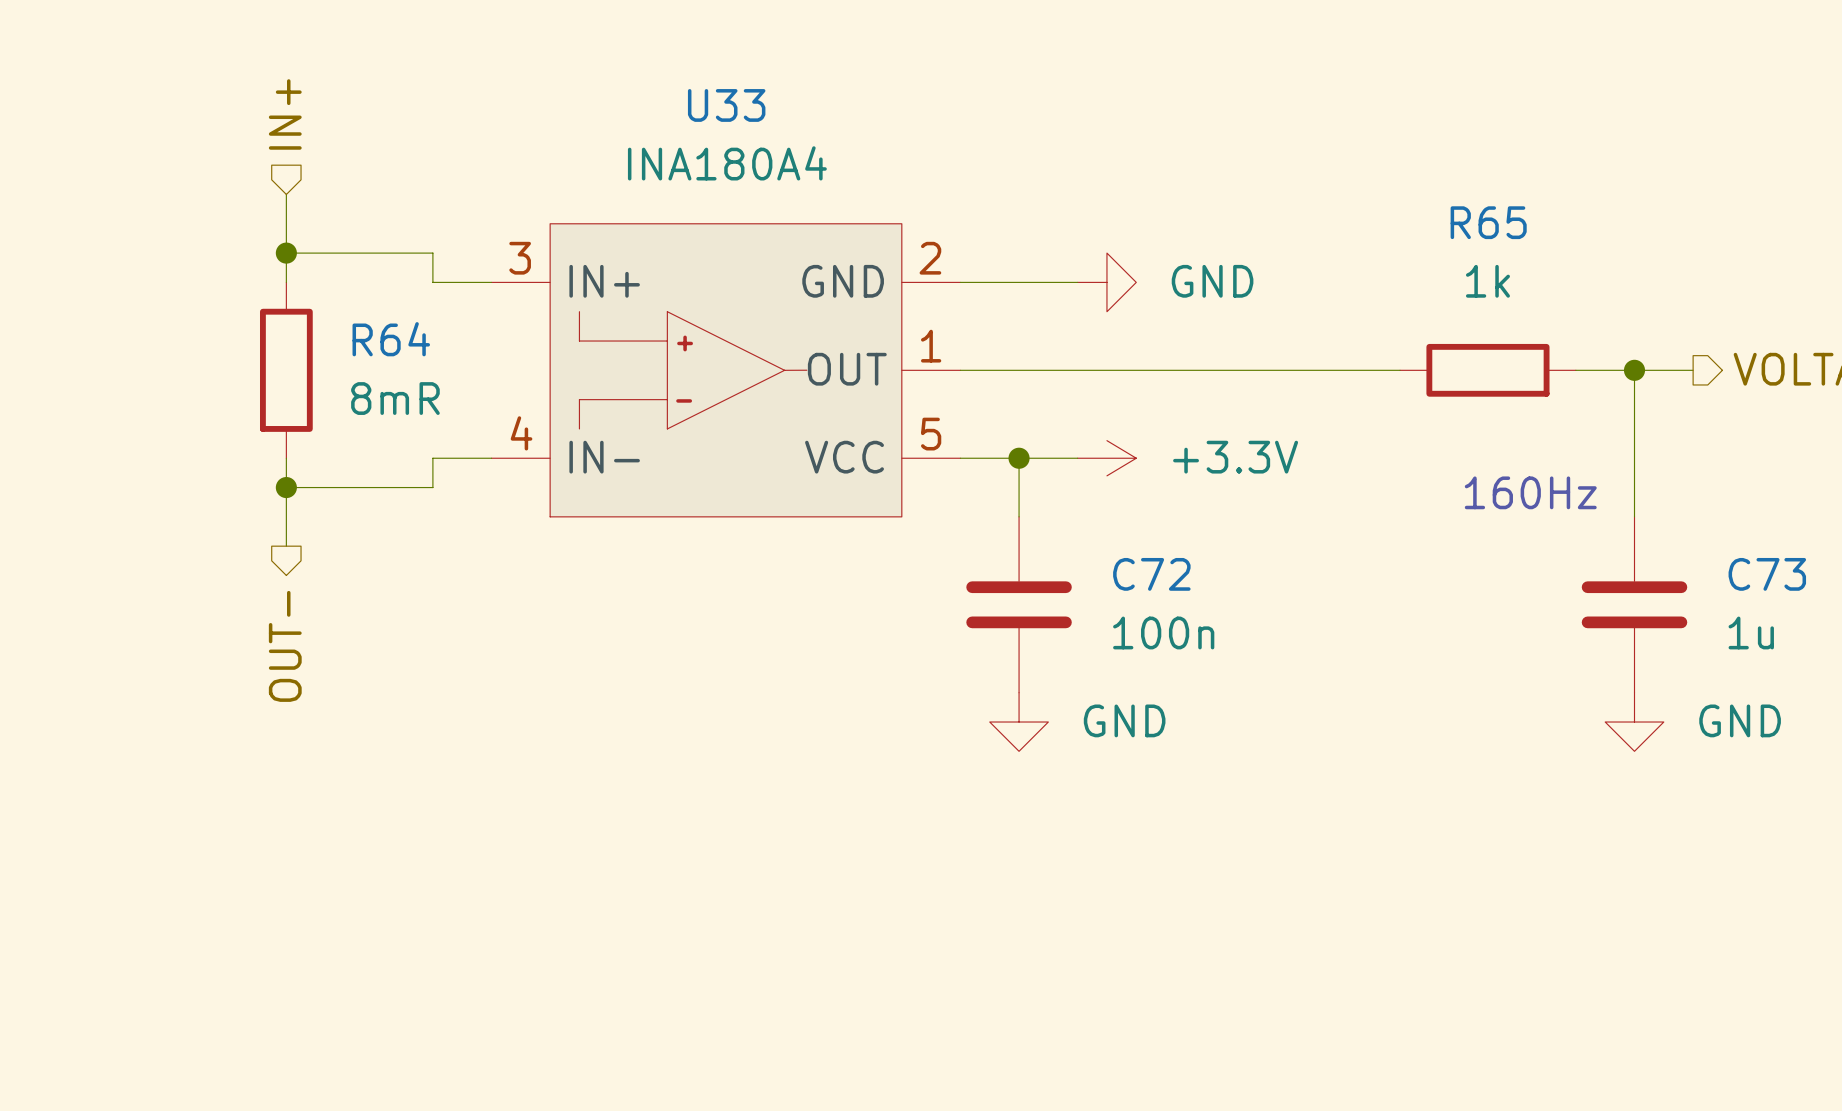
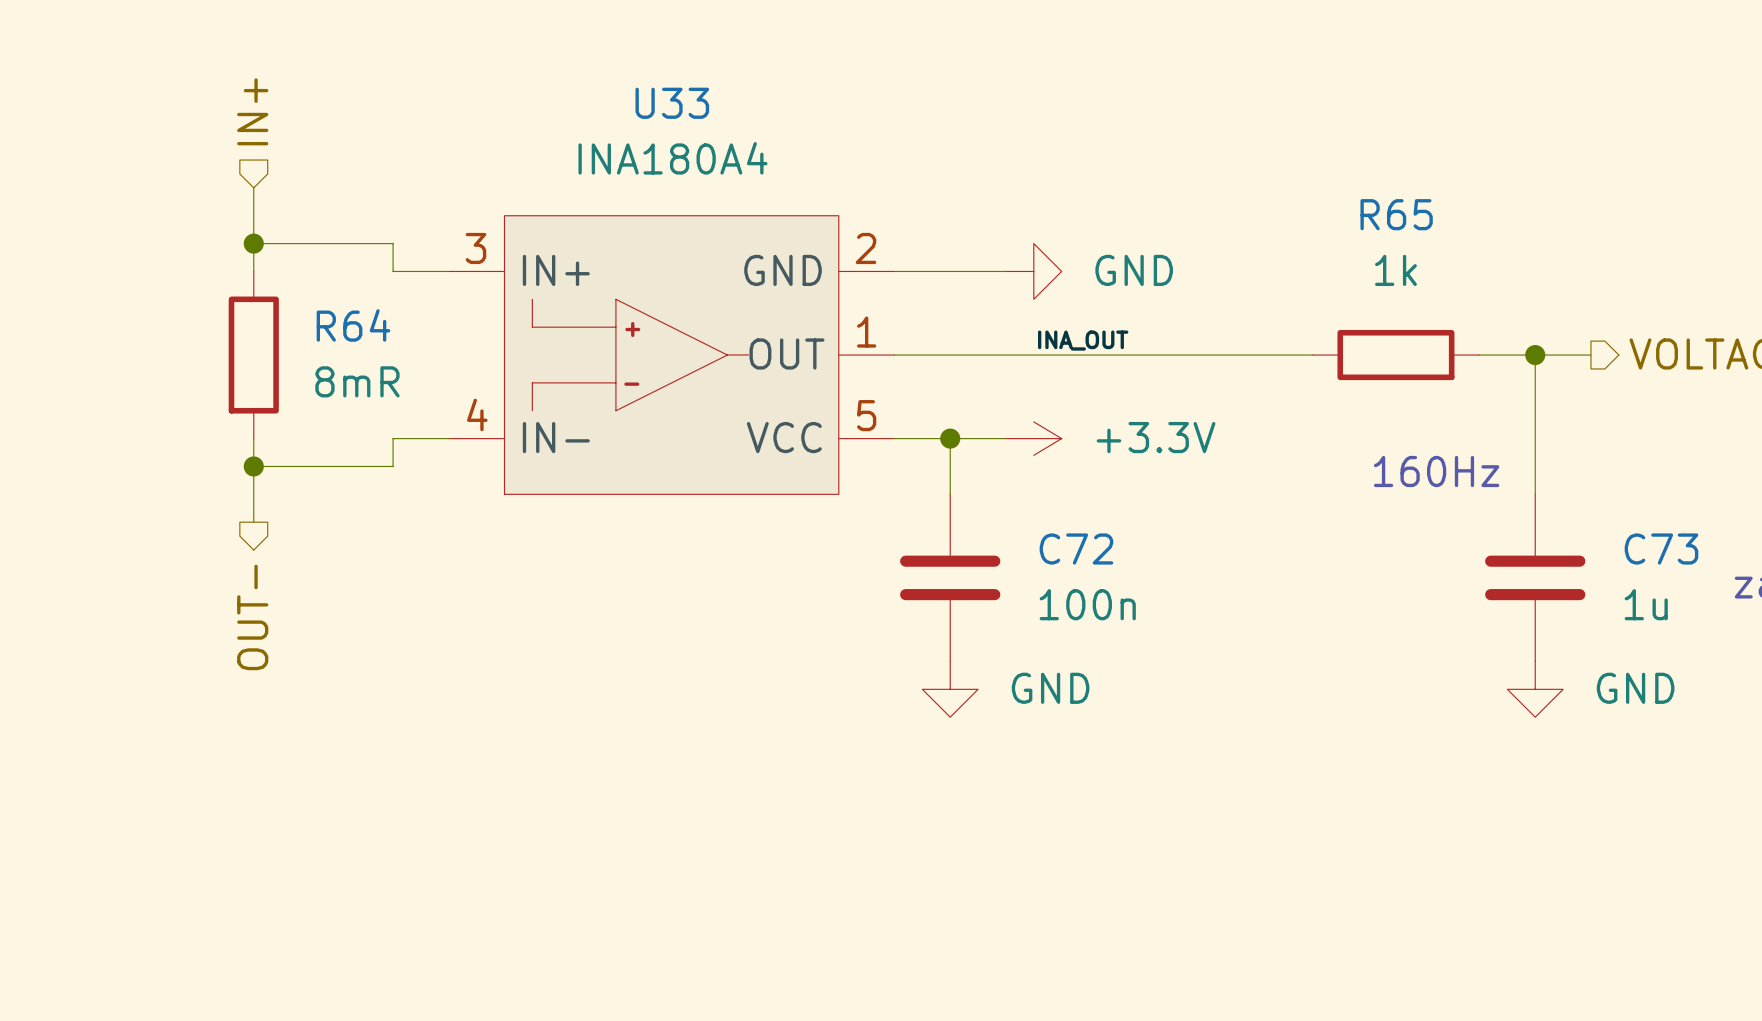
label: none -> INA_OUT (1083, 340)

